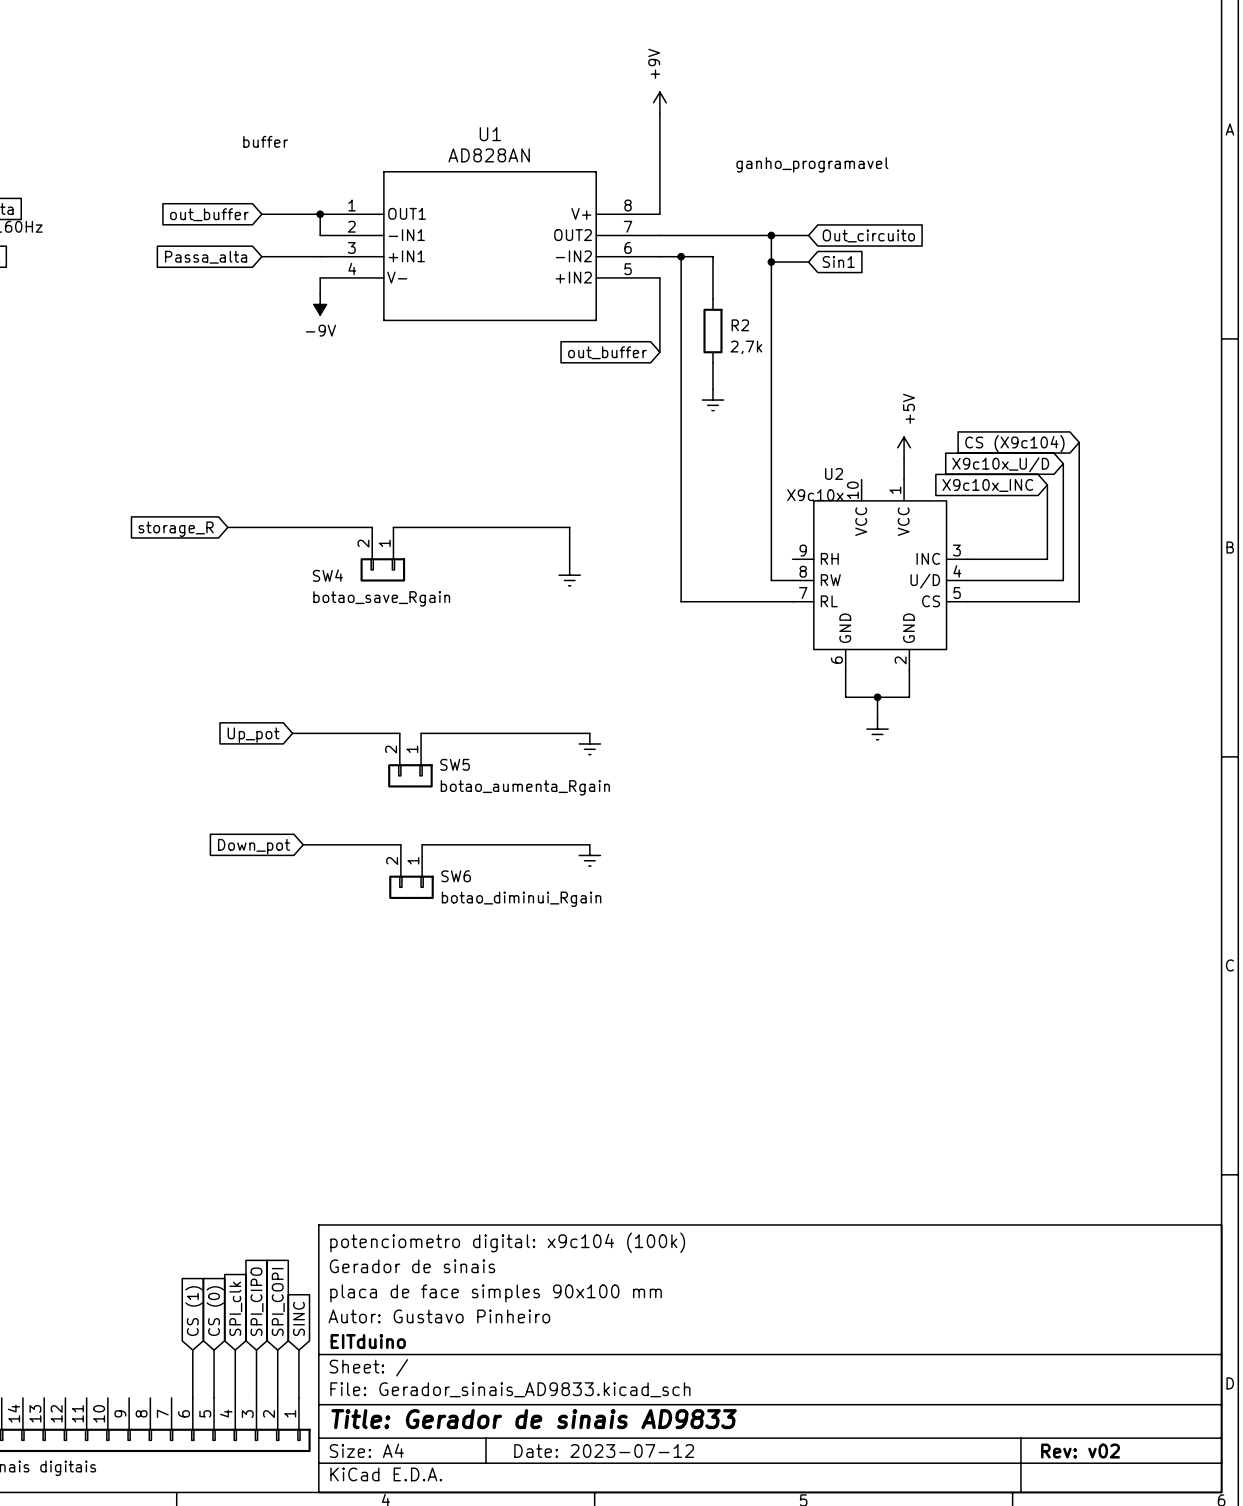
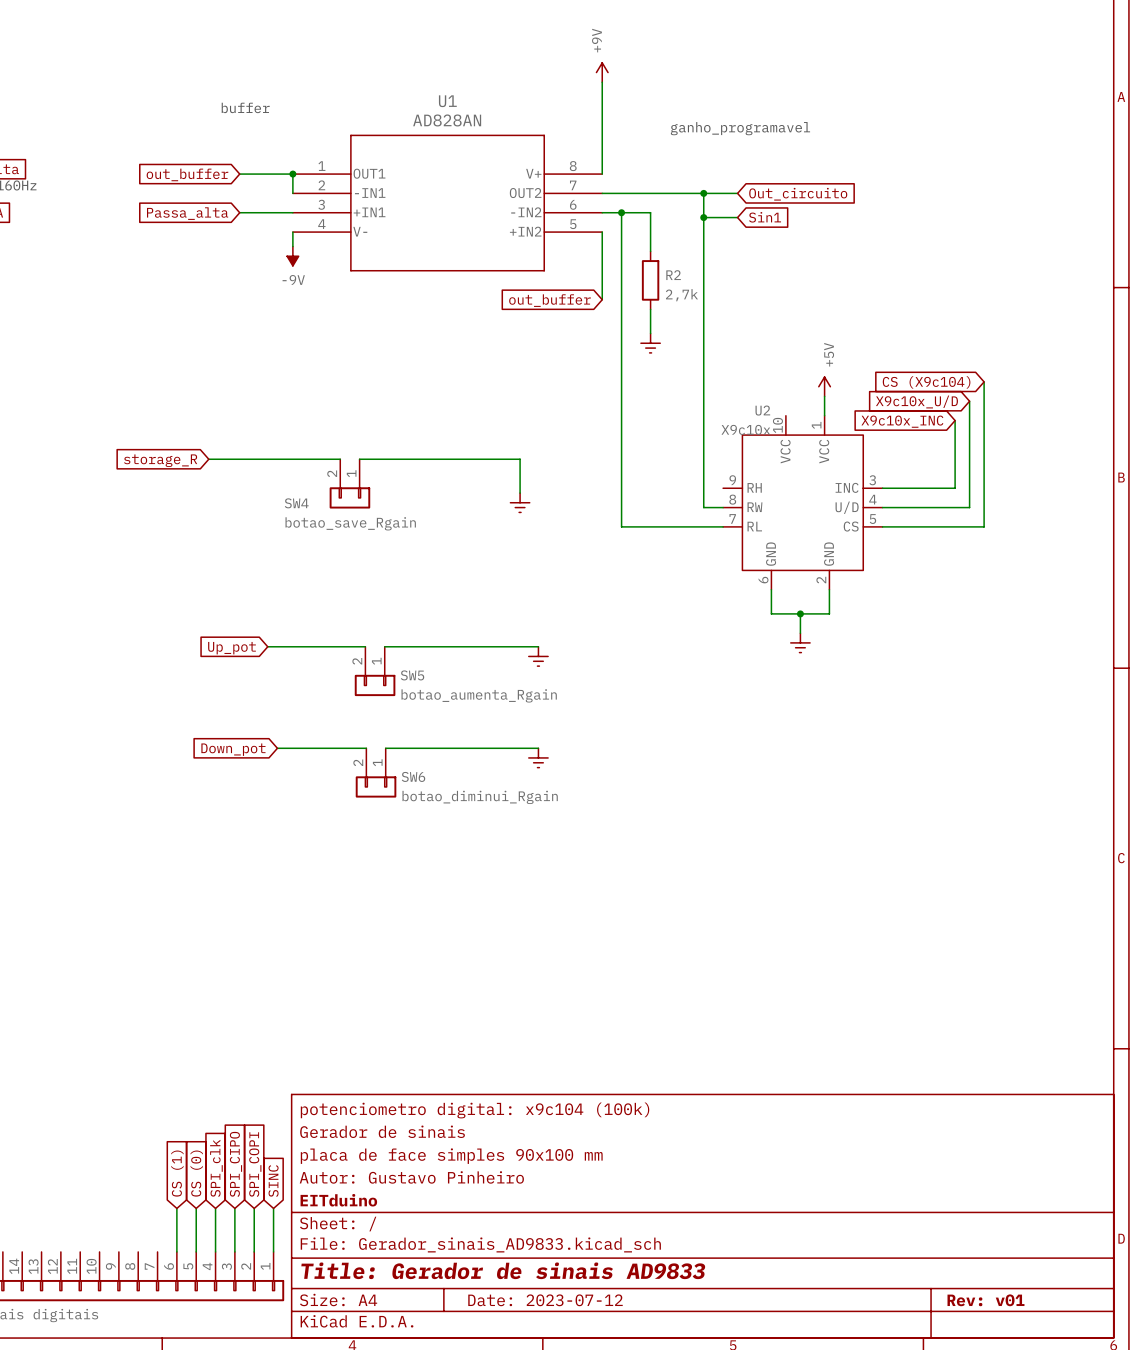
title block: Rev: v02 (1080, 1451) -> Rev: v01 (985, 1300)

